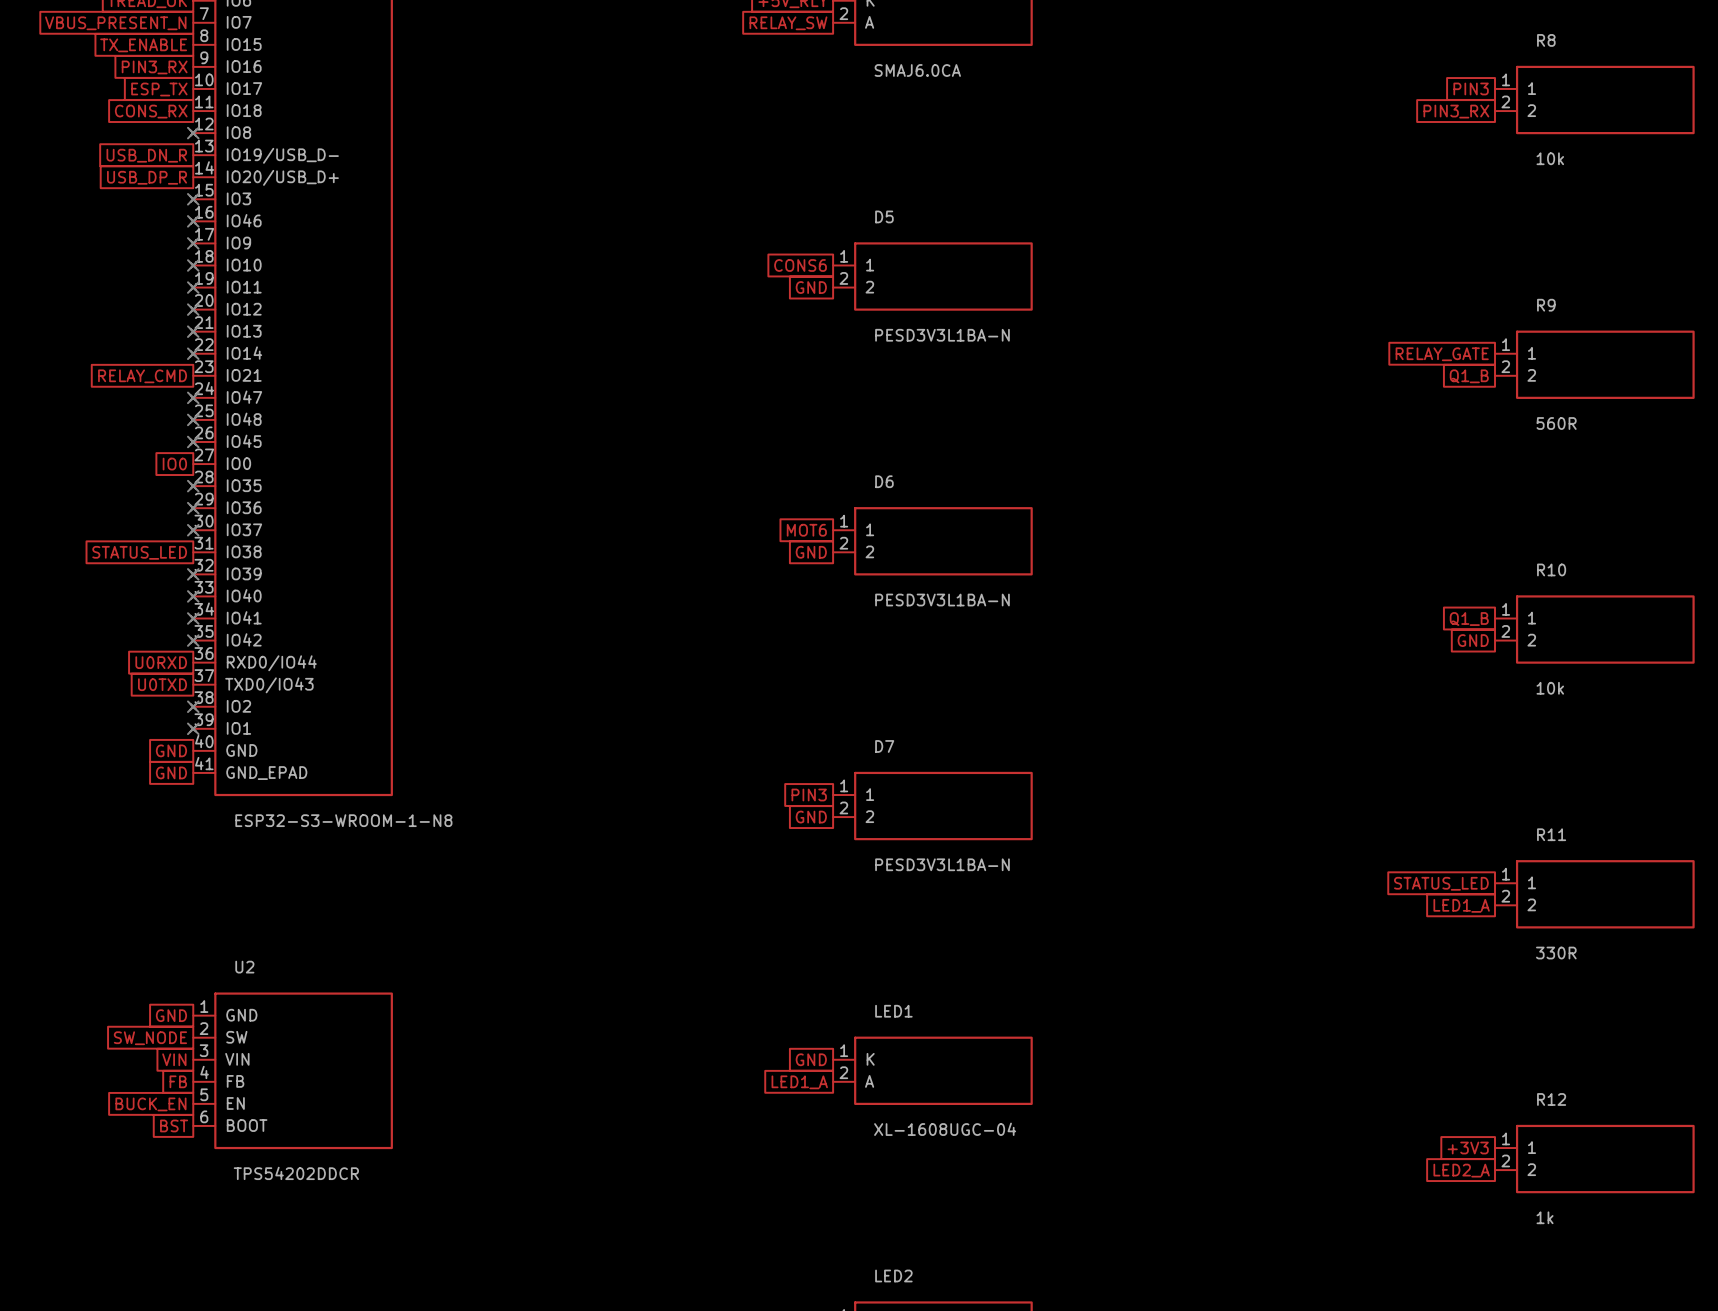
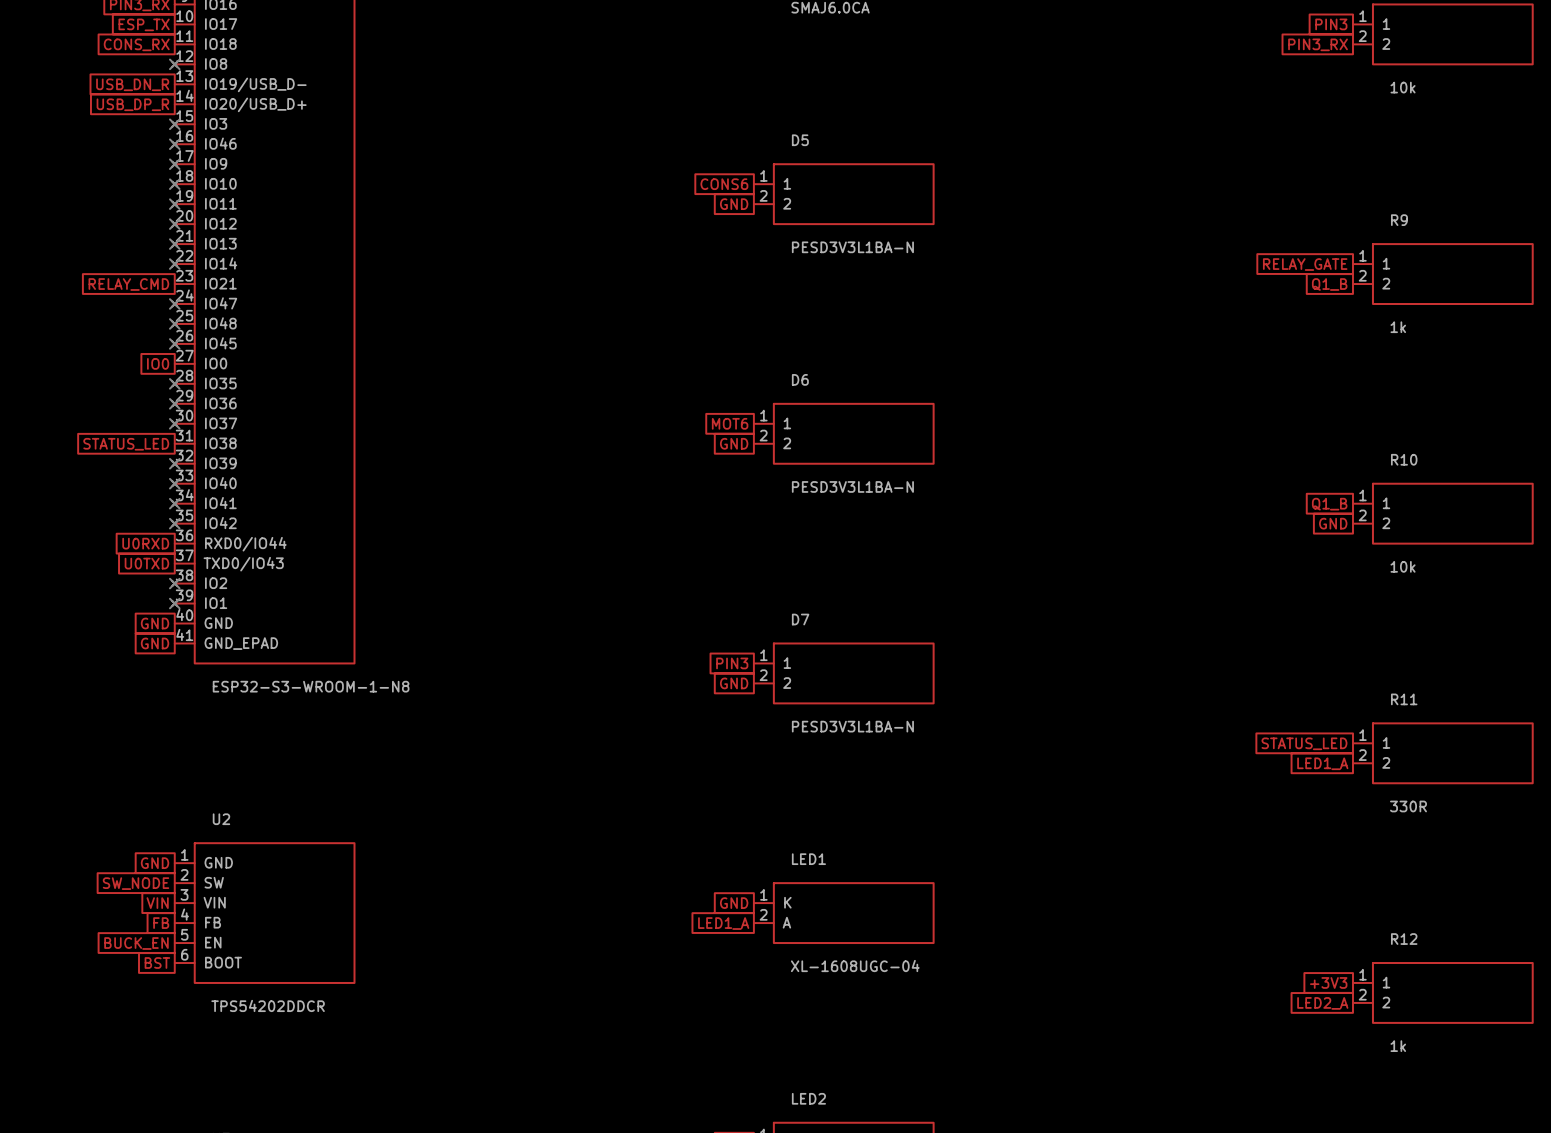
R9 value: 560R (1556, 423) -> 1k (1398, 327)

